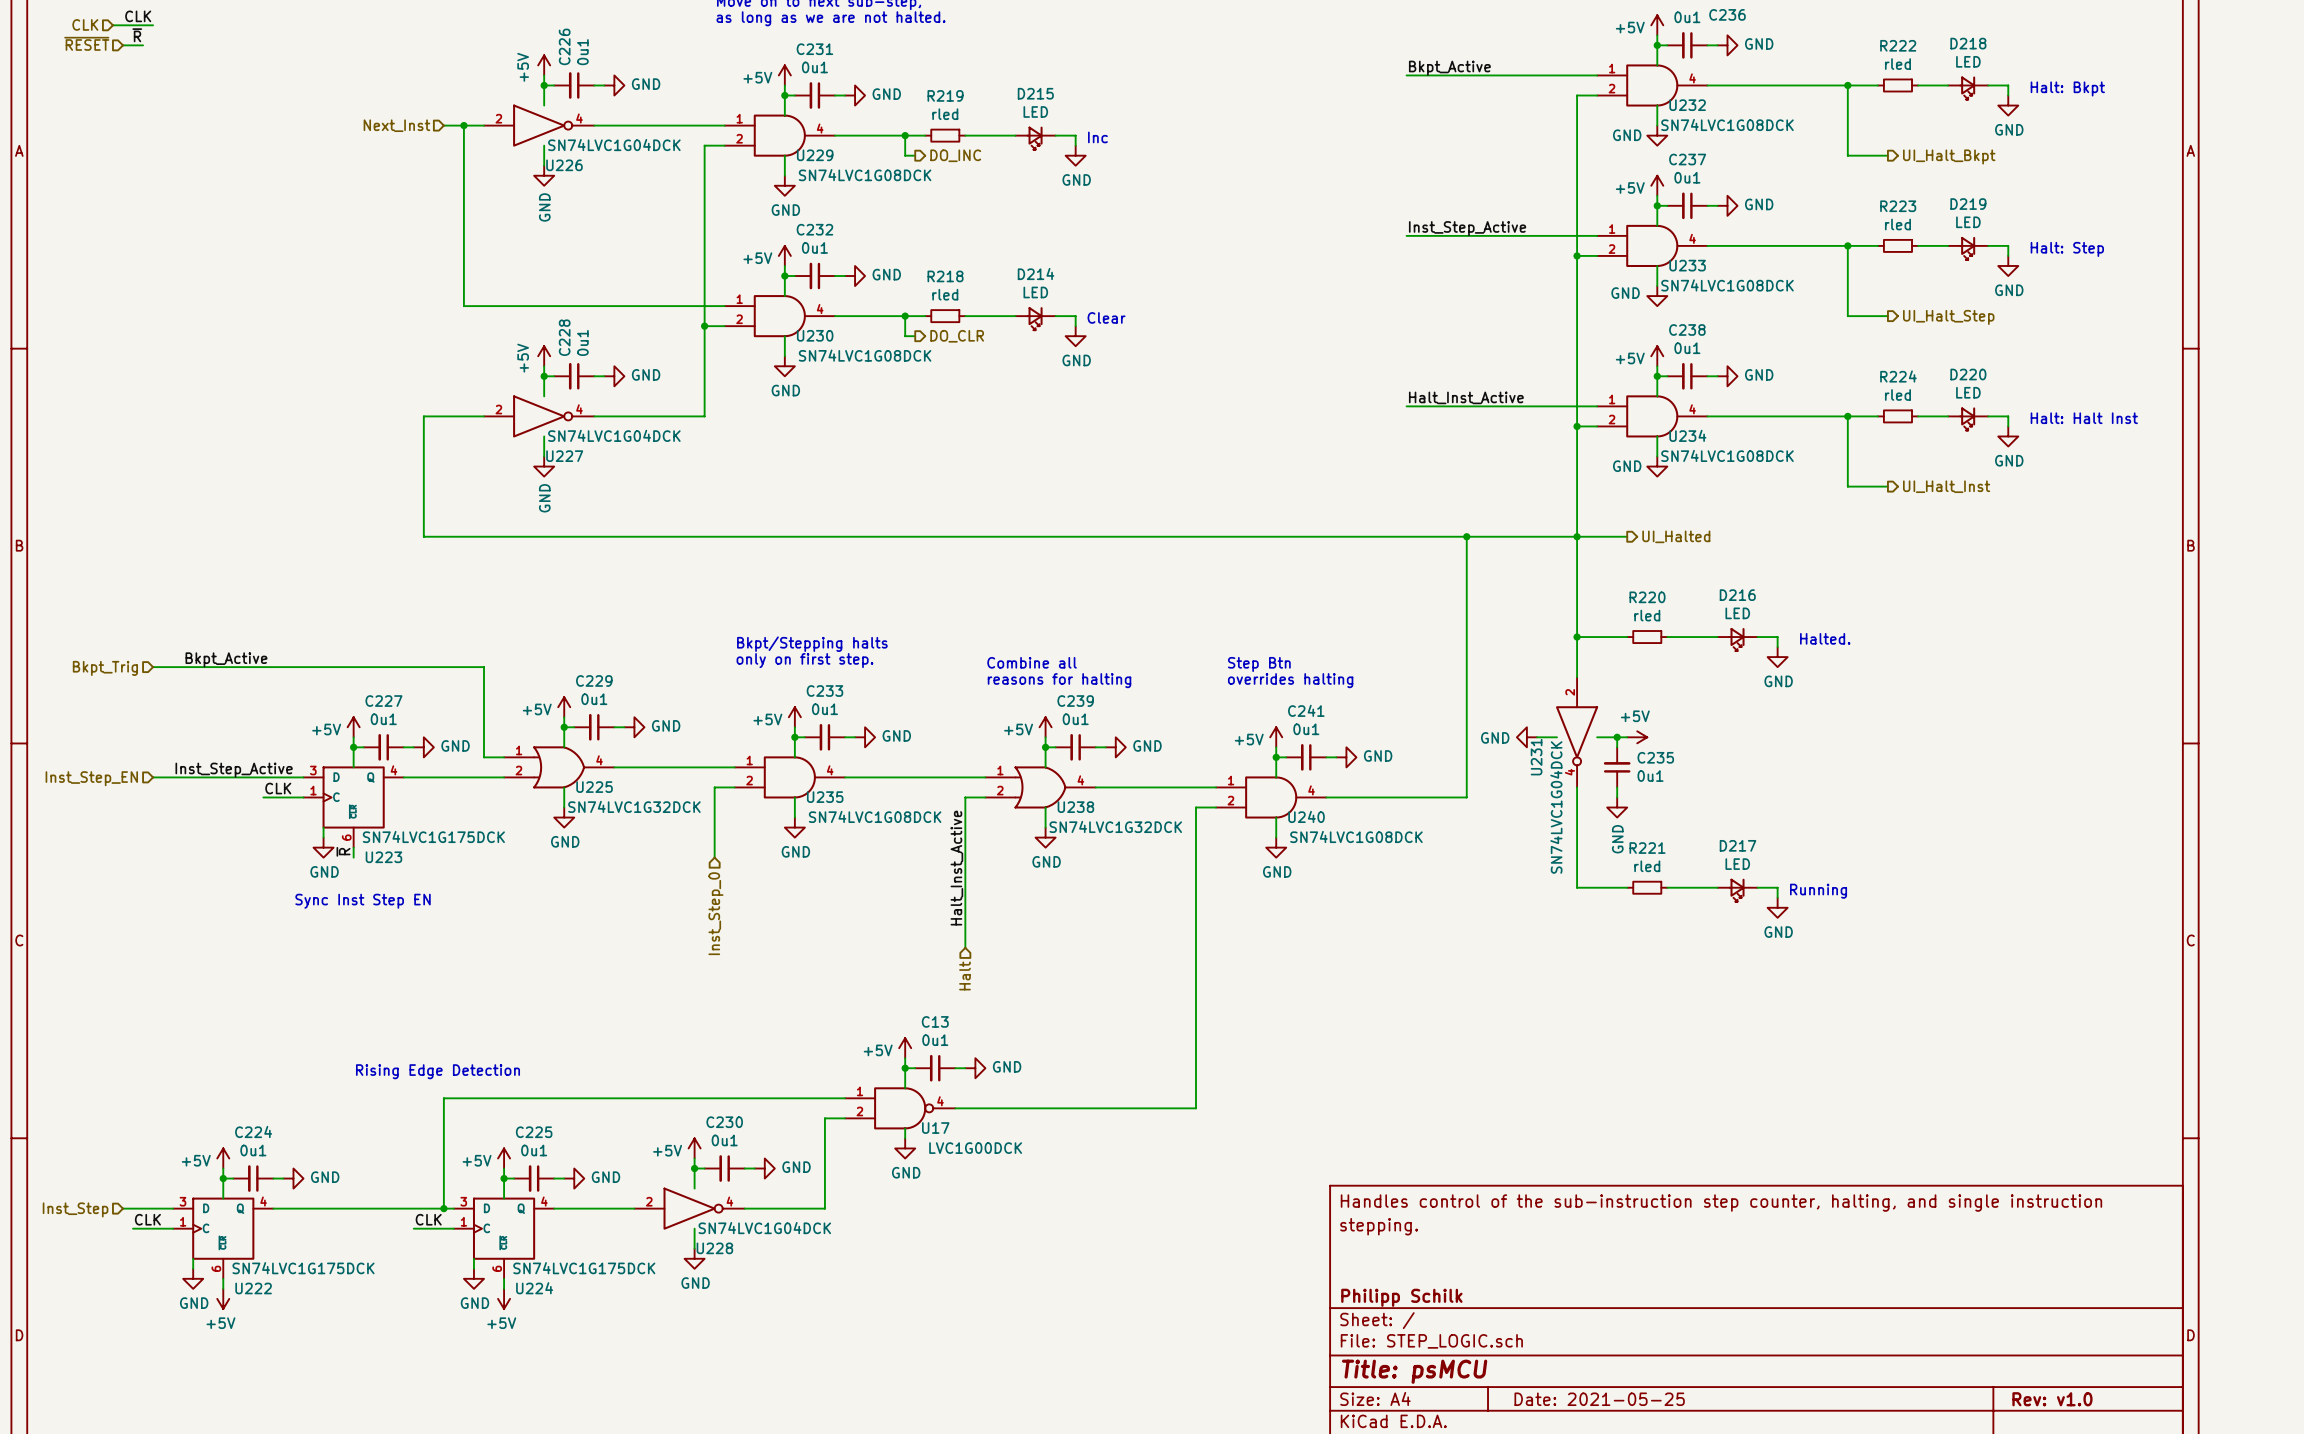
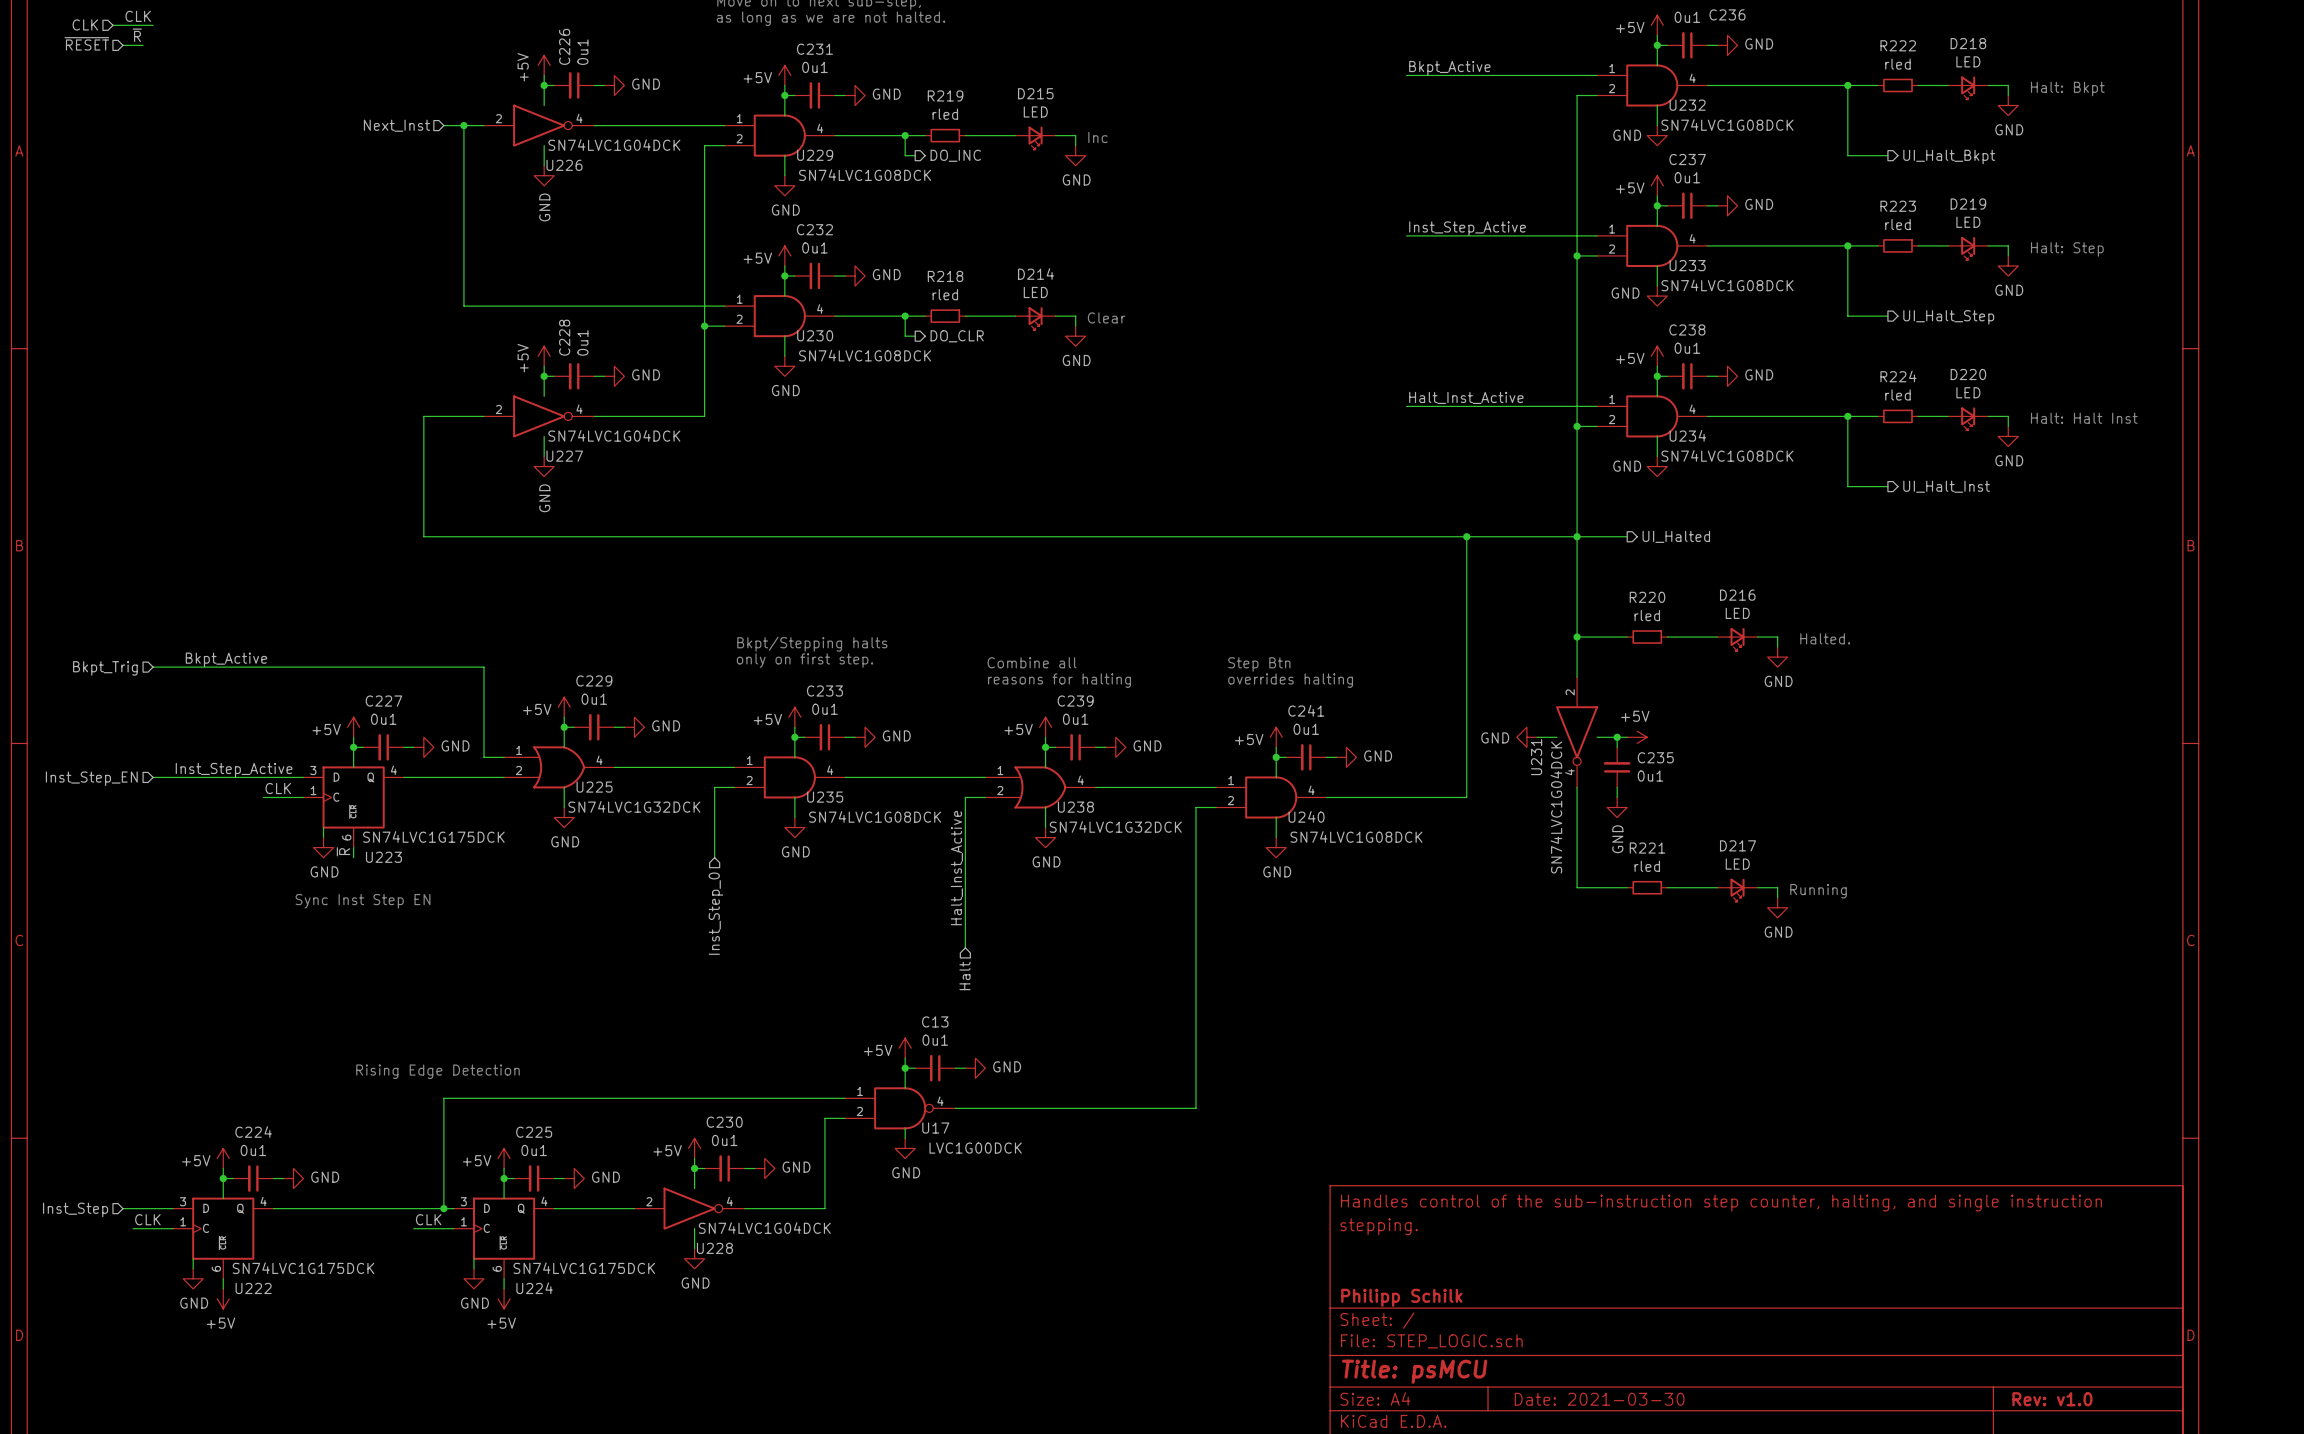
title block: Date: 2021-05-25 (1599, 1399) -> Date: 2021-03-30 (1599, 1399)

